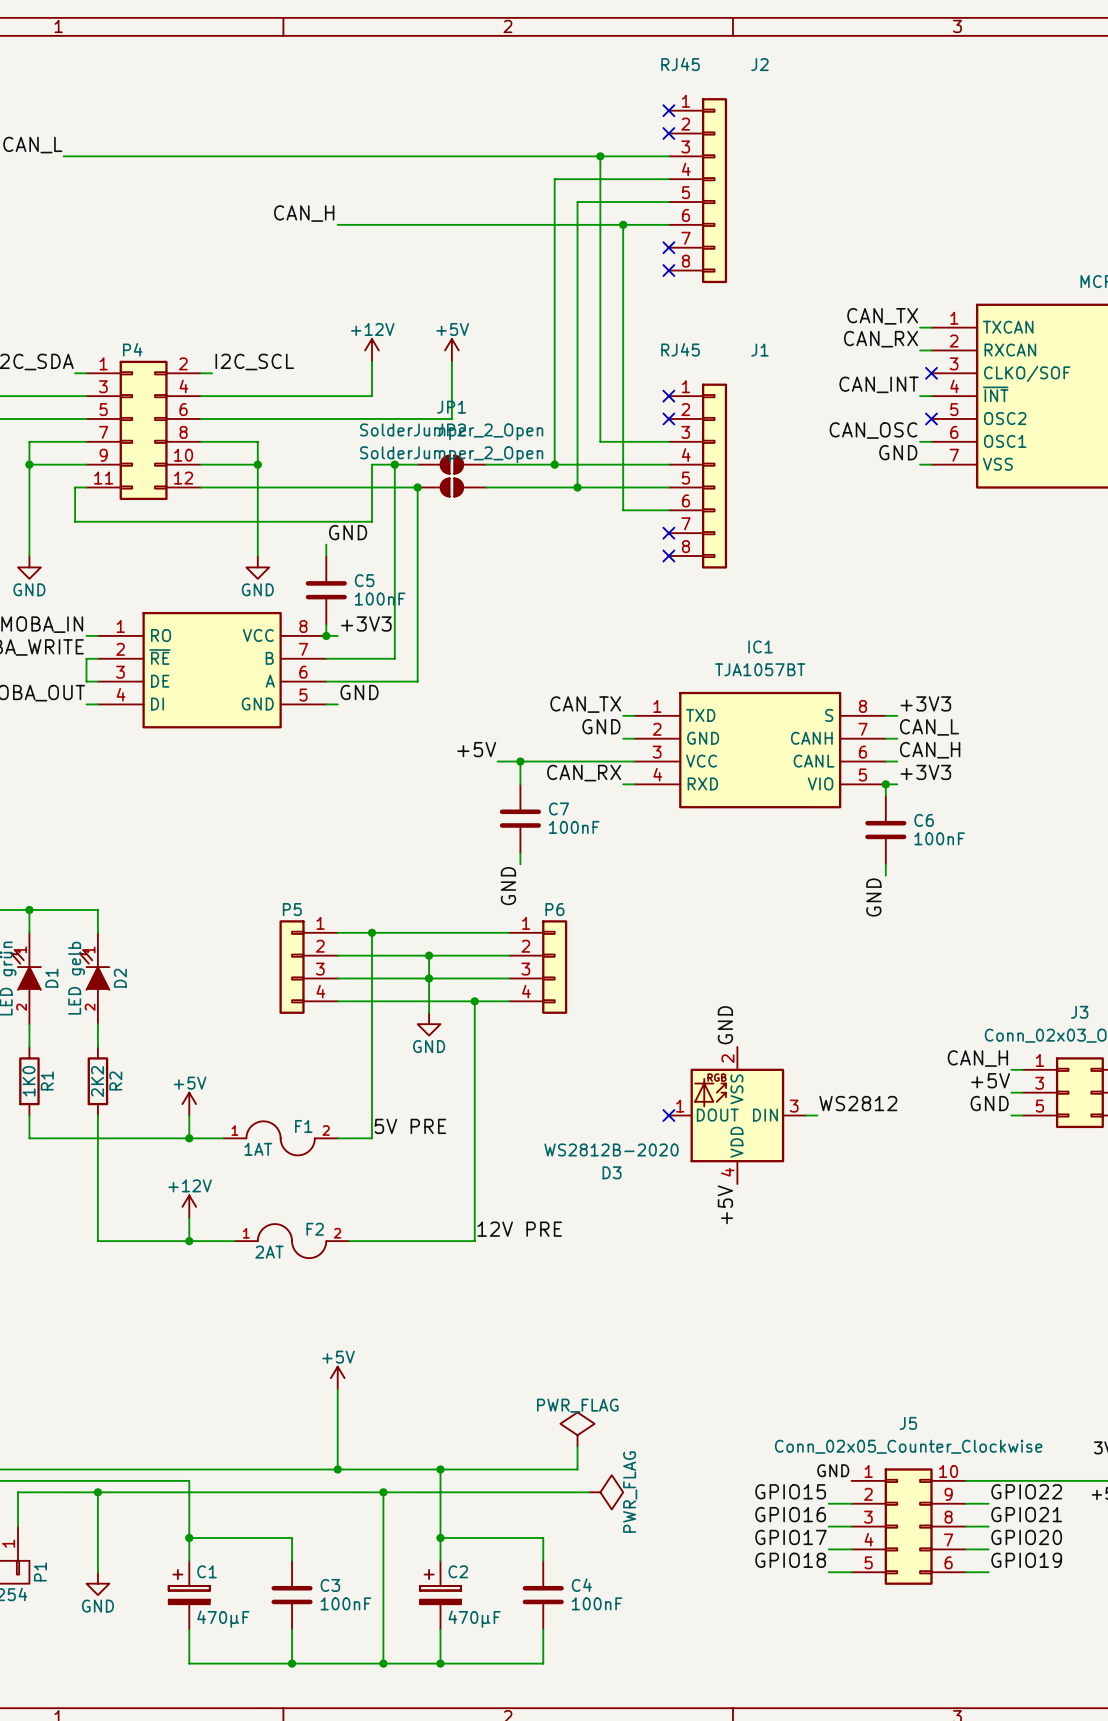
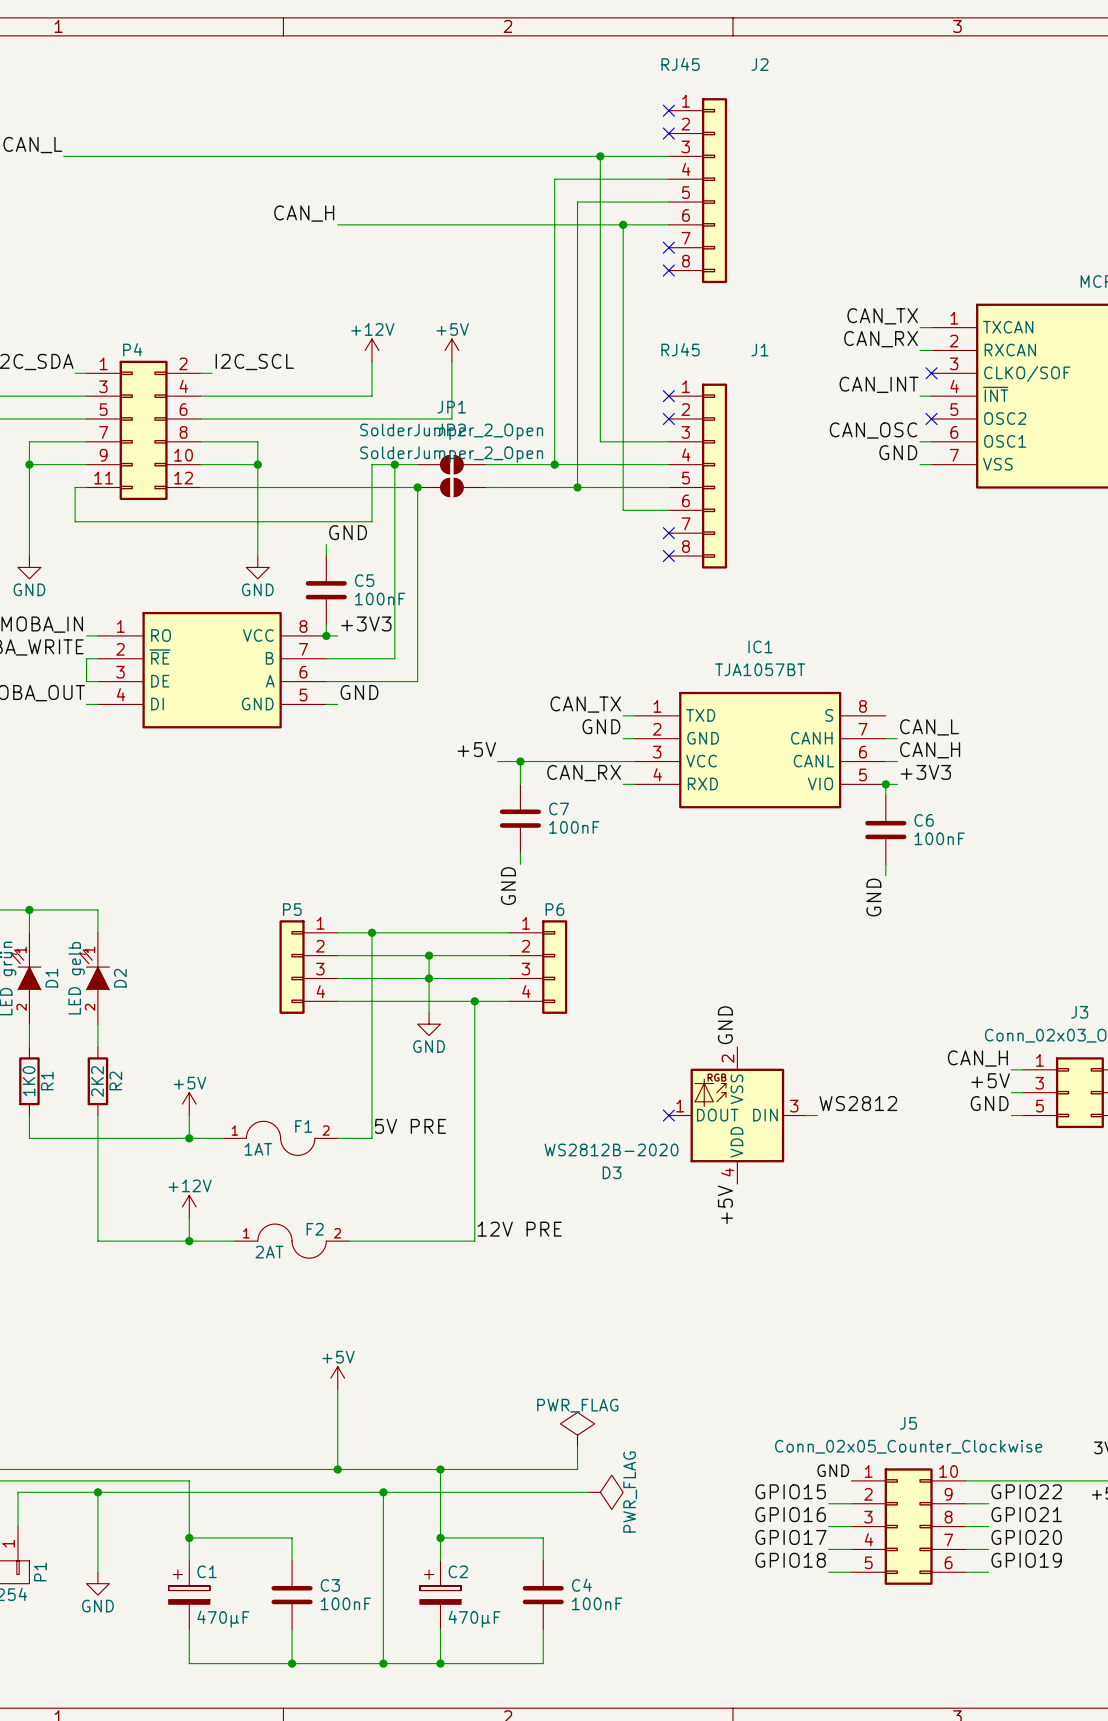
label: +3V3 (925, 703) -> none
wire: (885, 715) (897, 715) -> none

